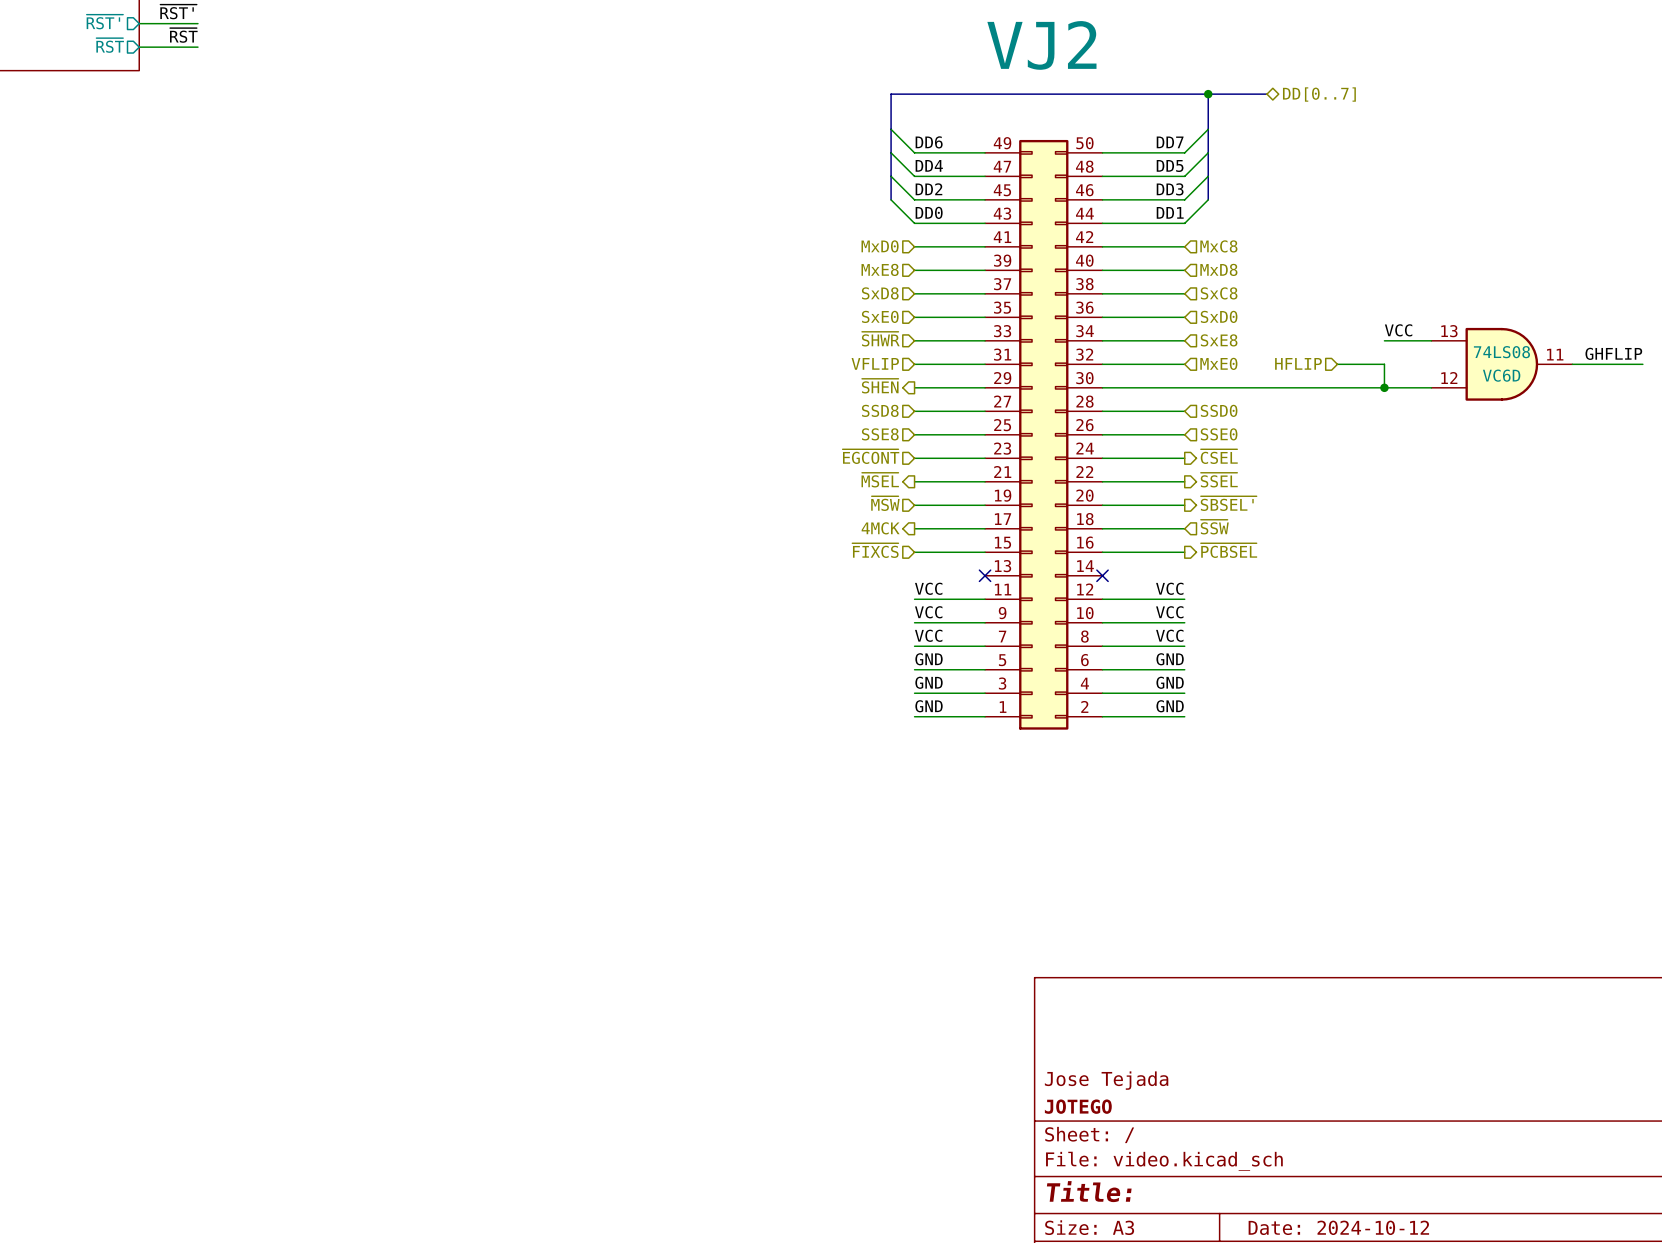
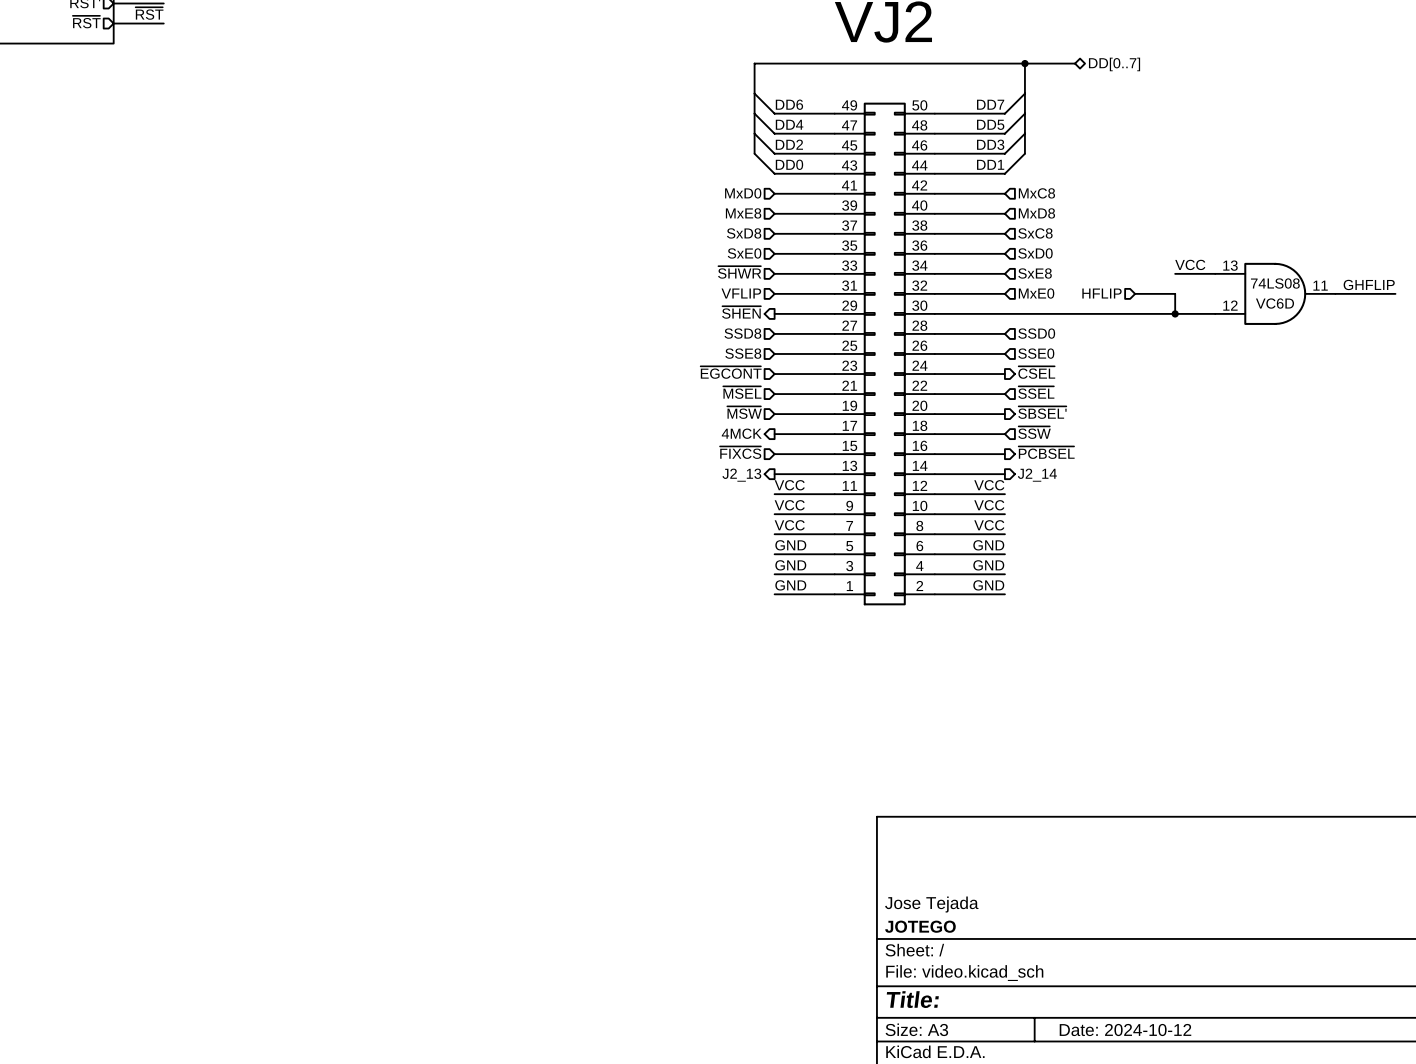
hierarchical label shape: output (880, 480) -> input (742, 392)
hierarchical label shape: output (1219, 480) -> input (1036, 392)
wire: none -> (774, 474) (834, 474)
no-connect mark: (985, 575) -> none
wire: none -> (934, 474) (1004, 474)
no-connect mark: (1102, 575) -> none
hierarchical label: none -> J2_13 (741, 475)
hierarchical label: none -> J2_14 (1037, 475)

